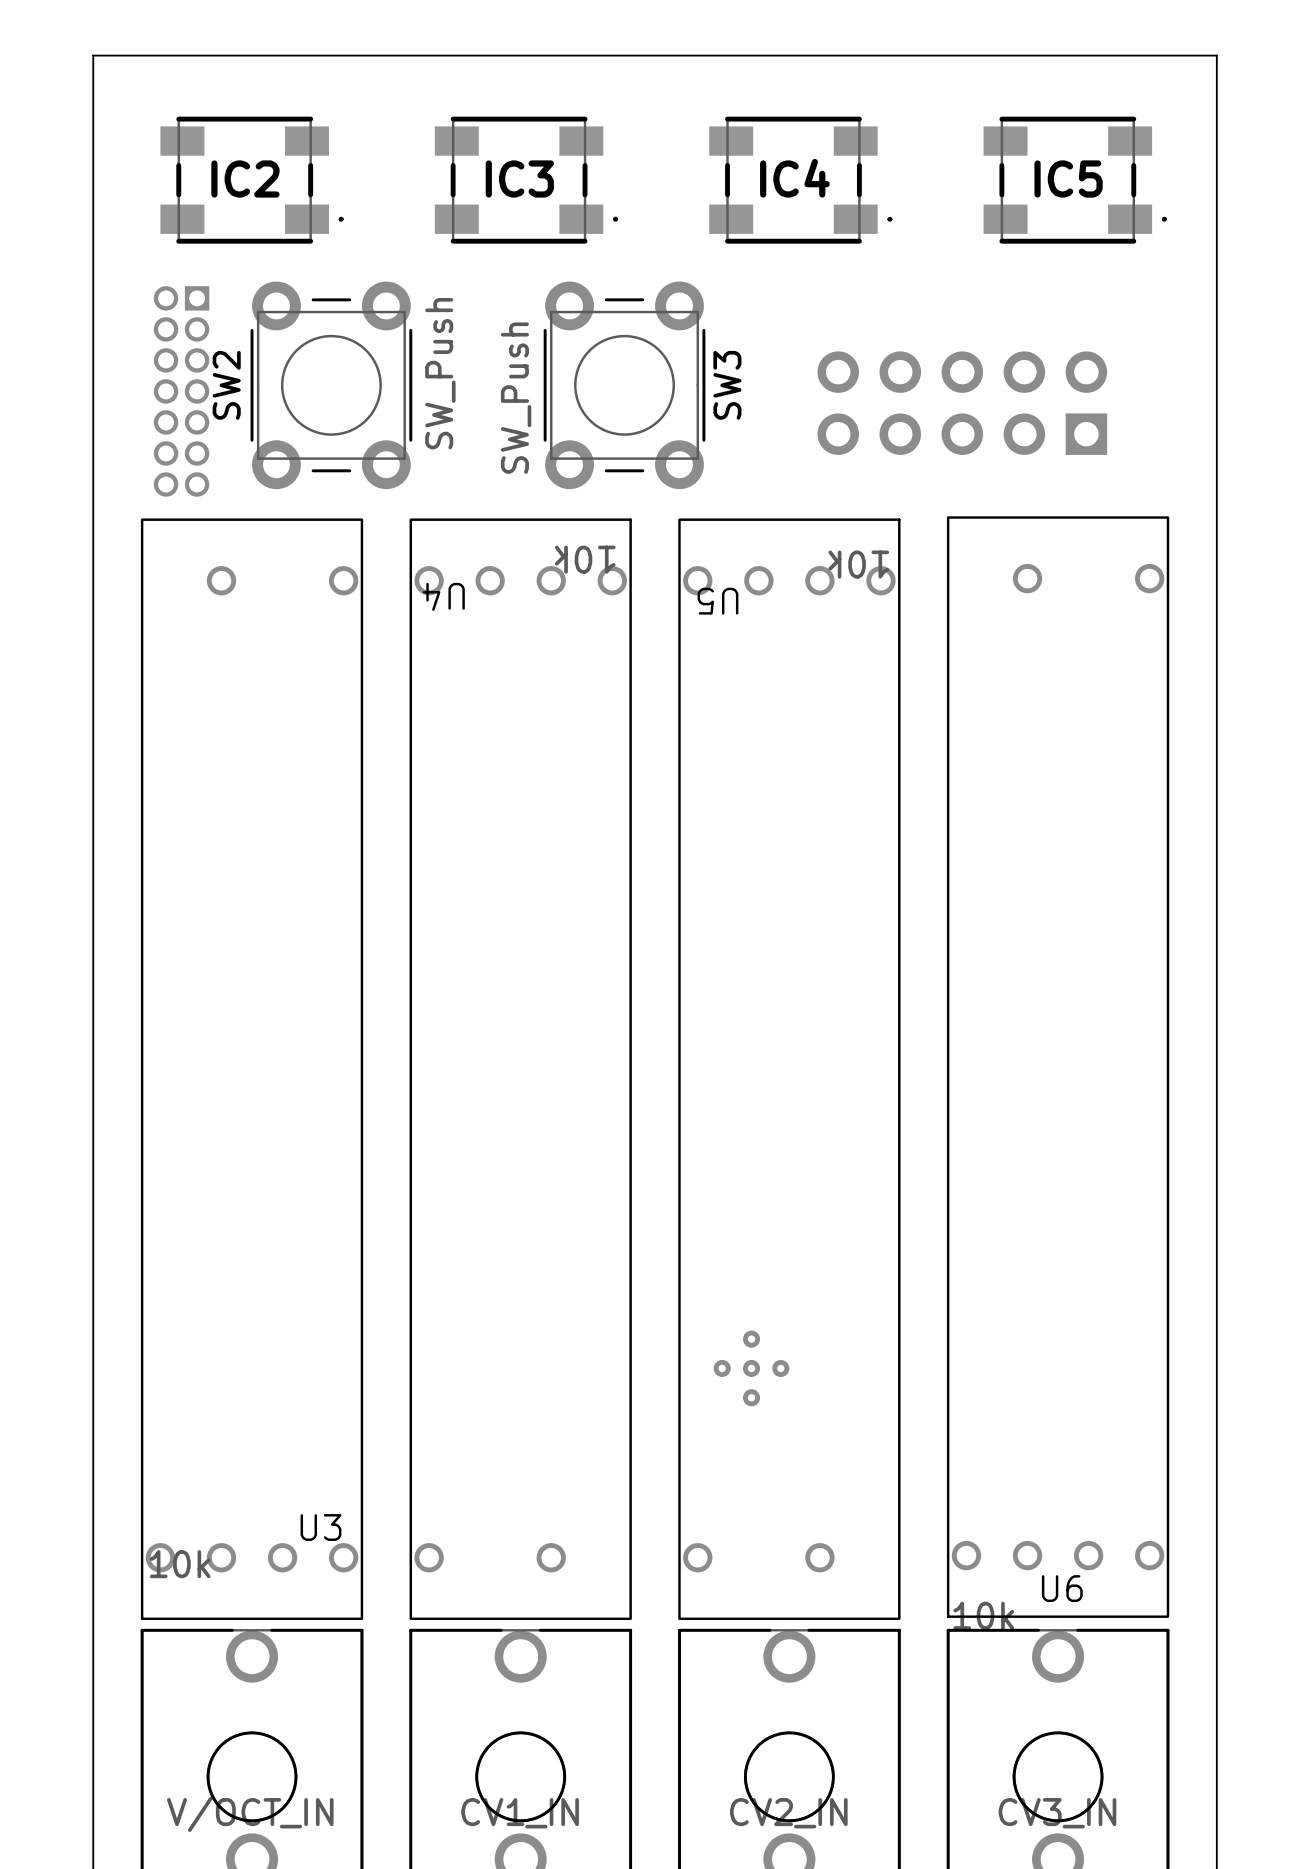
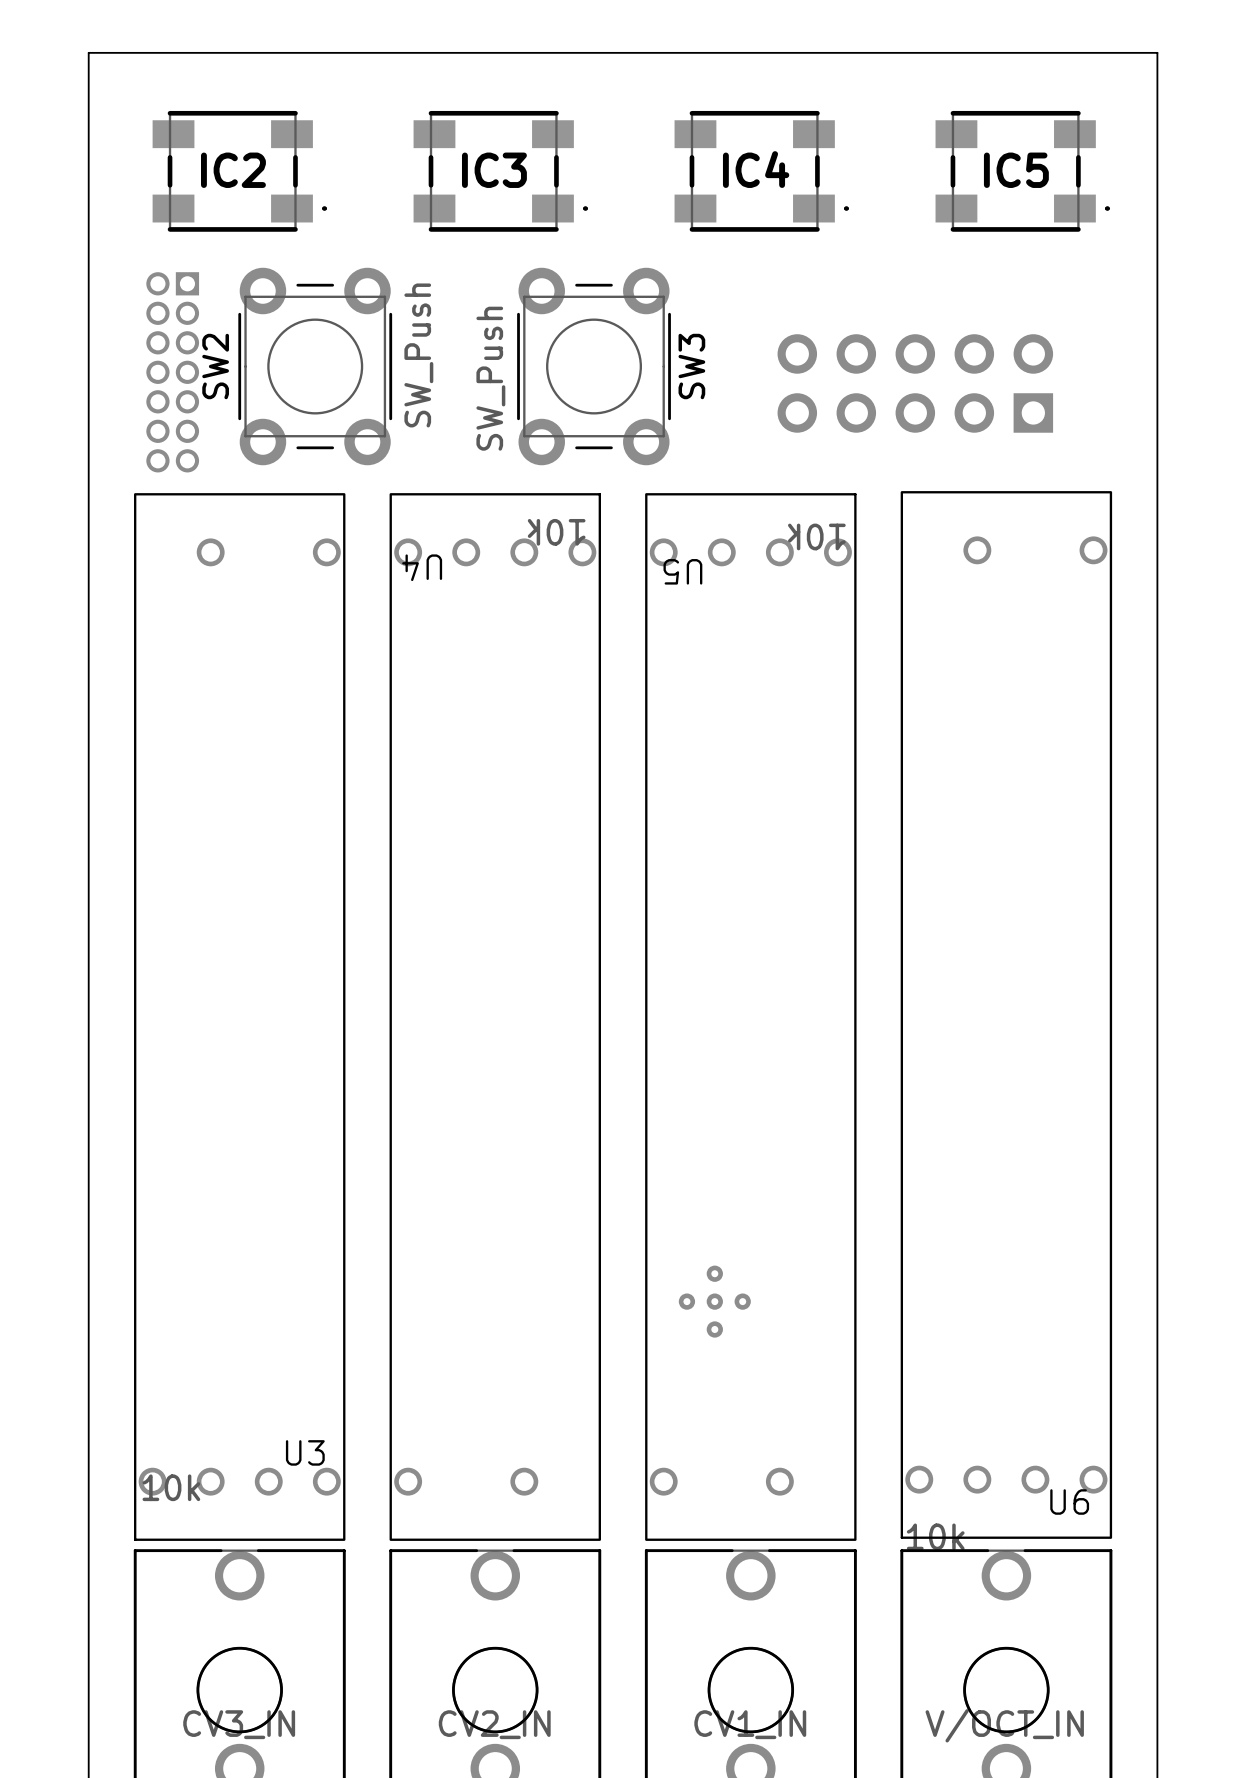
U6 name position: U6 (1062, 1588) -> U6 (1069, 1501)
part value: CV1_IN (520, 1813) -> CV2_IN (494, 1724)
part value: CV2_IN (788, 1813) -> CV1_IN (750, 1724)
part value: CV3_IN (1057, 1813) -> V/OCT_IN (1004, 1725)
part value: V/OCT_IN (250, 1814) -> CV3_IN (239, 1724)

